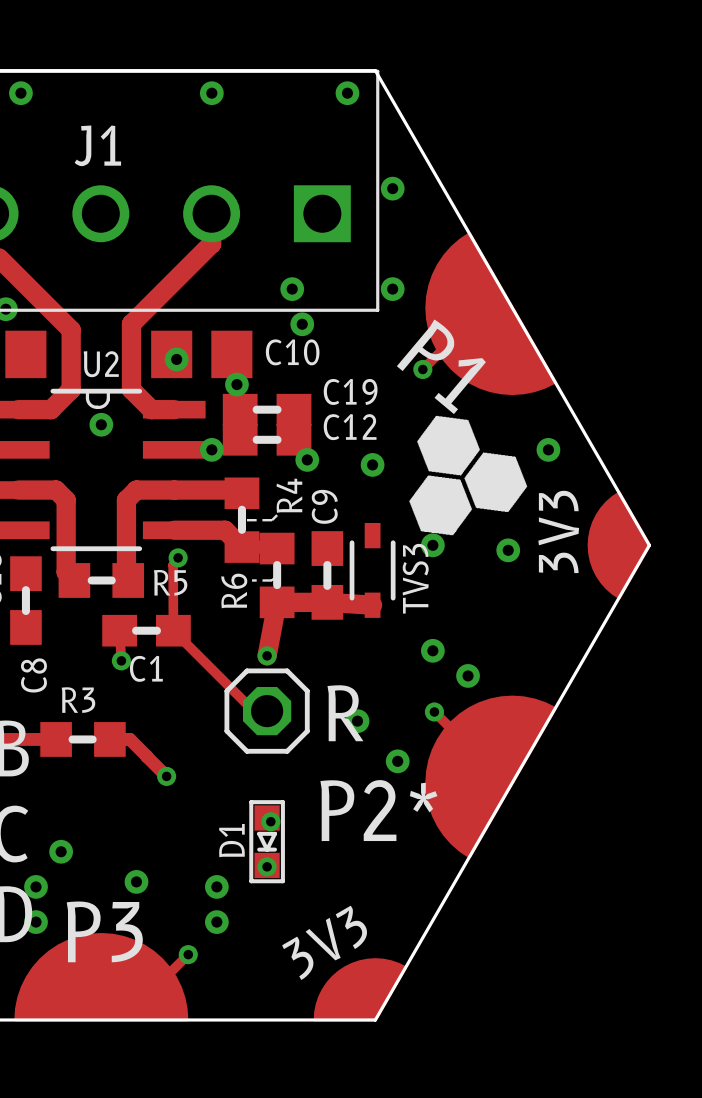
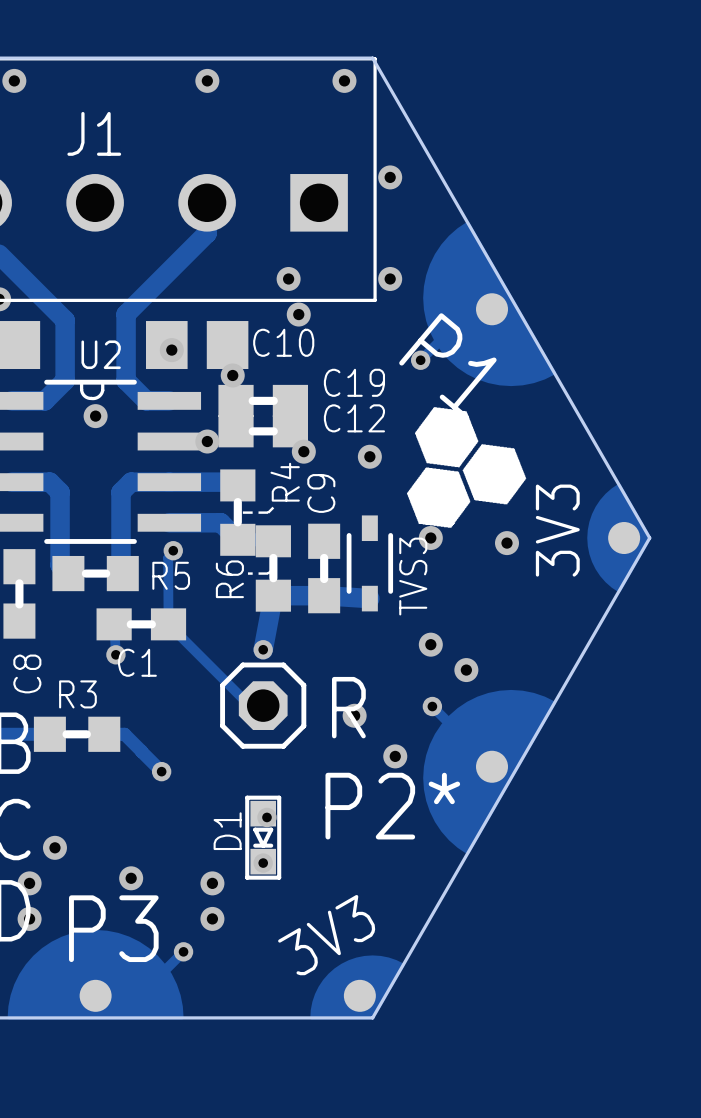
via: (548, 449) -> none

